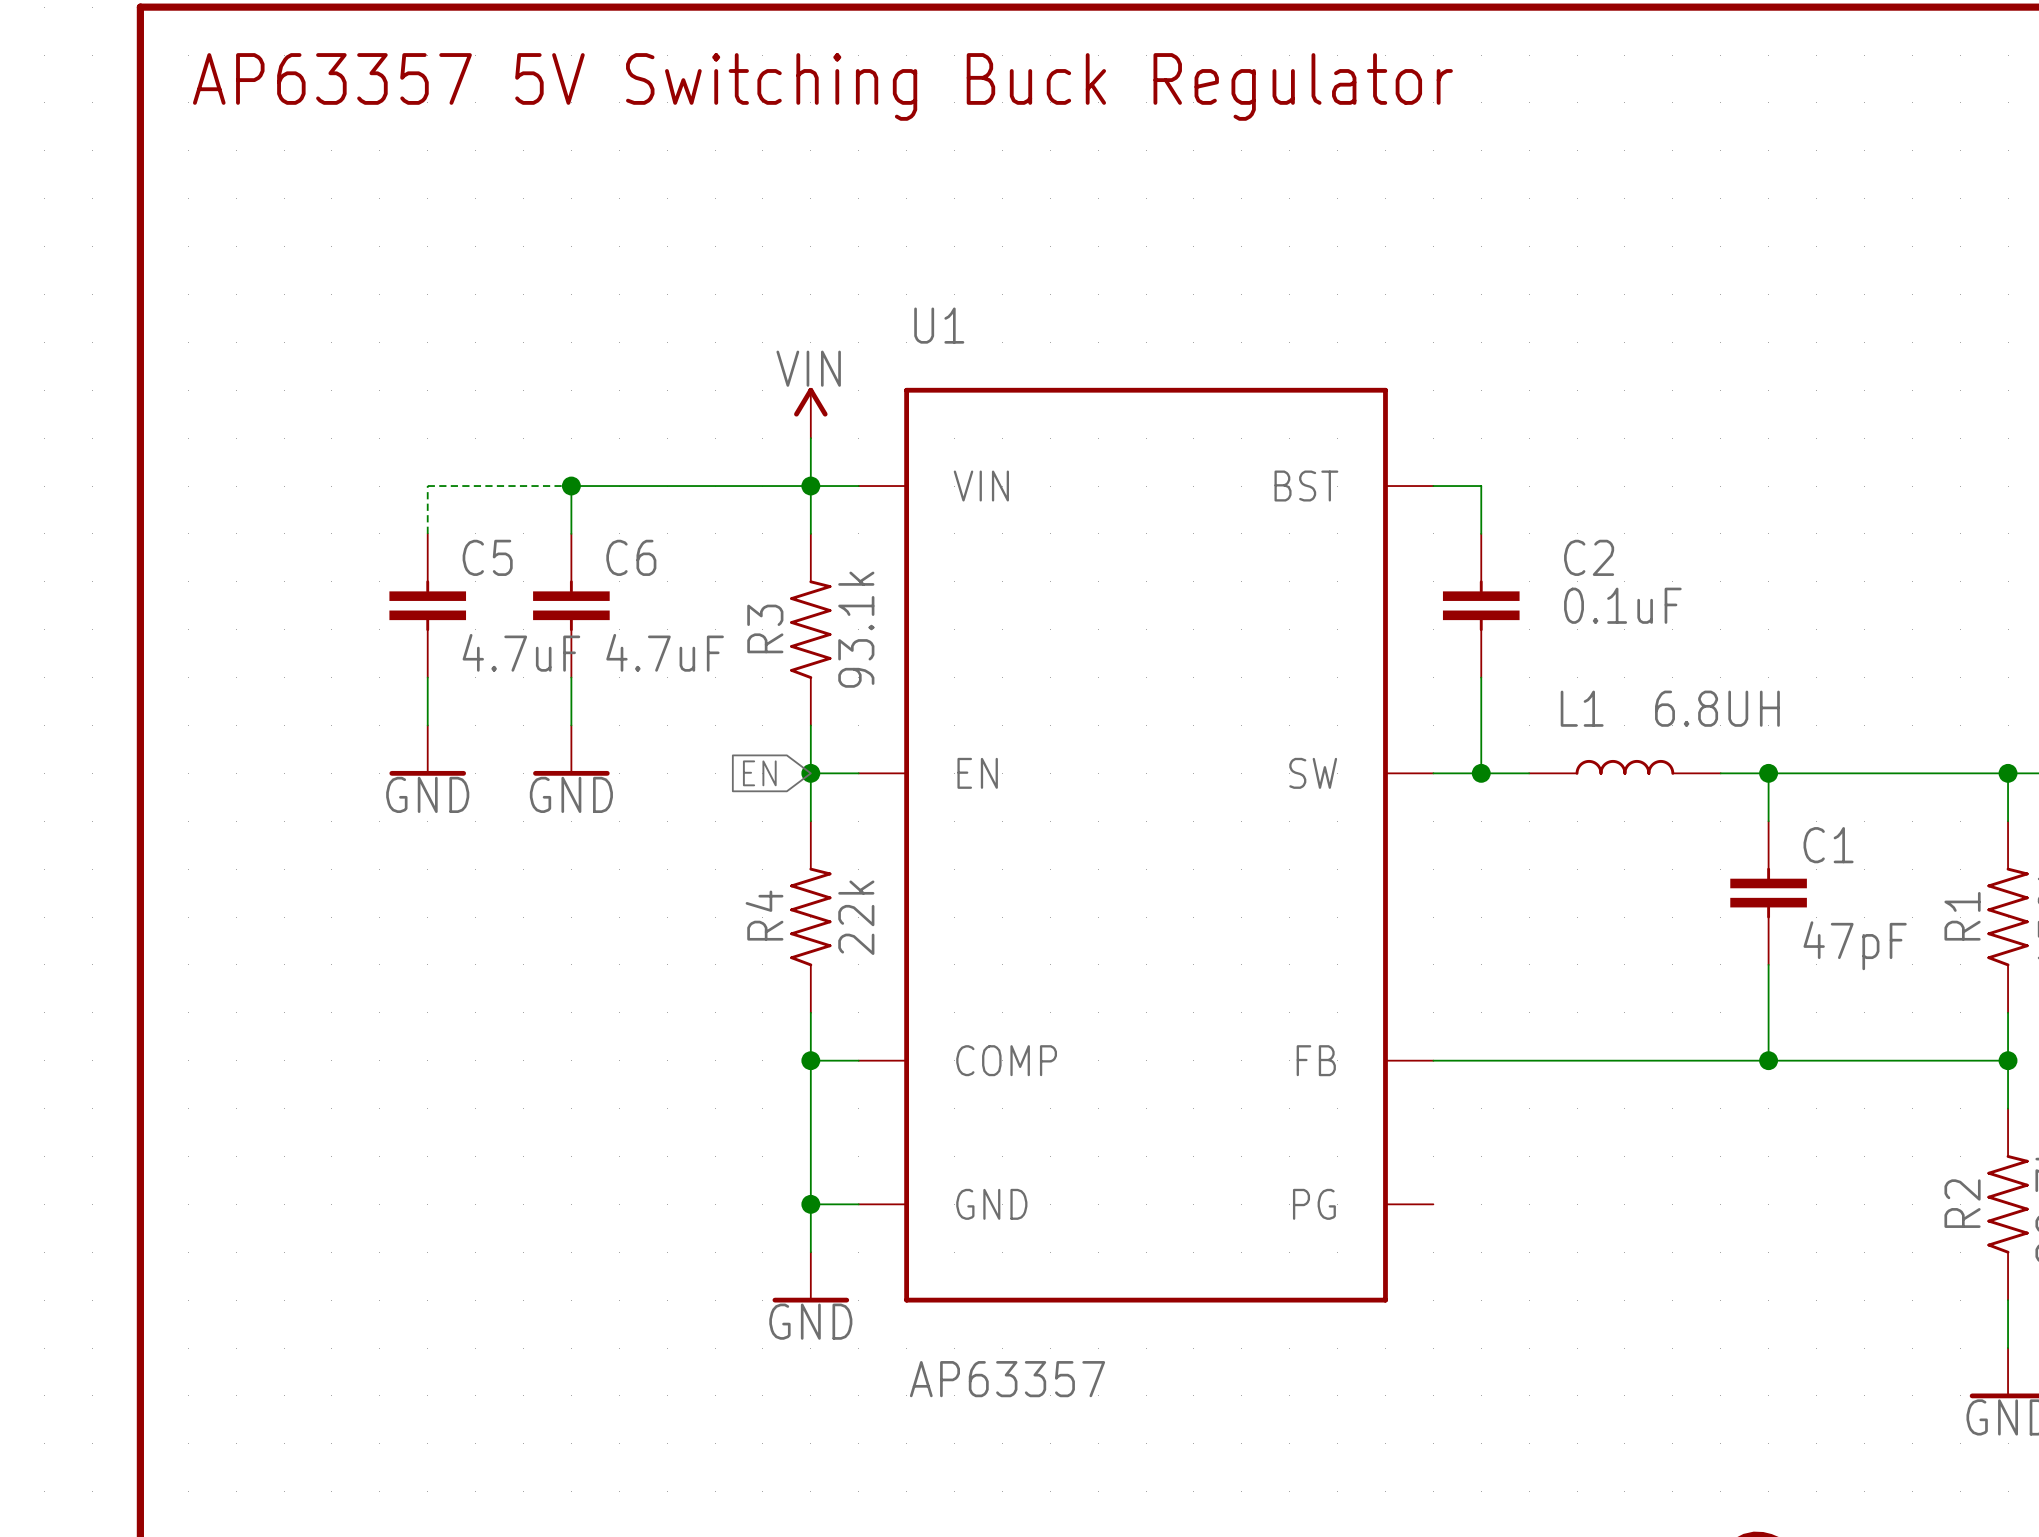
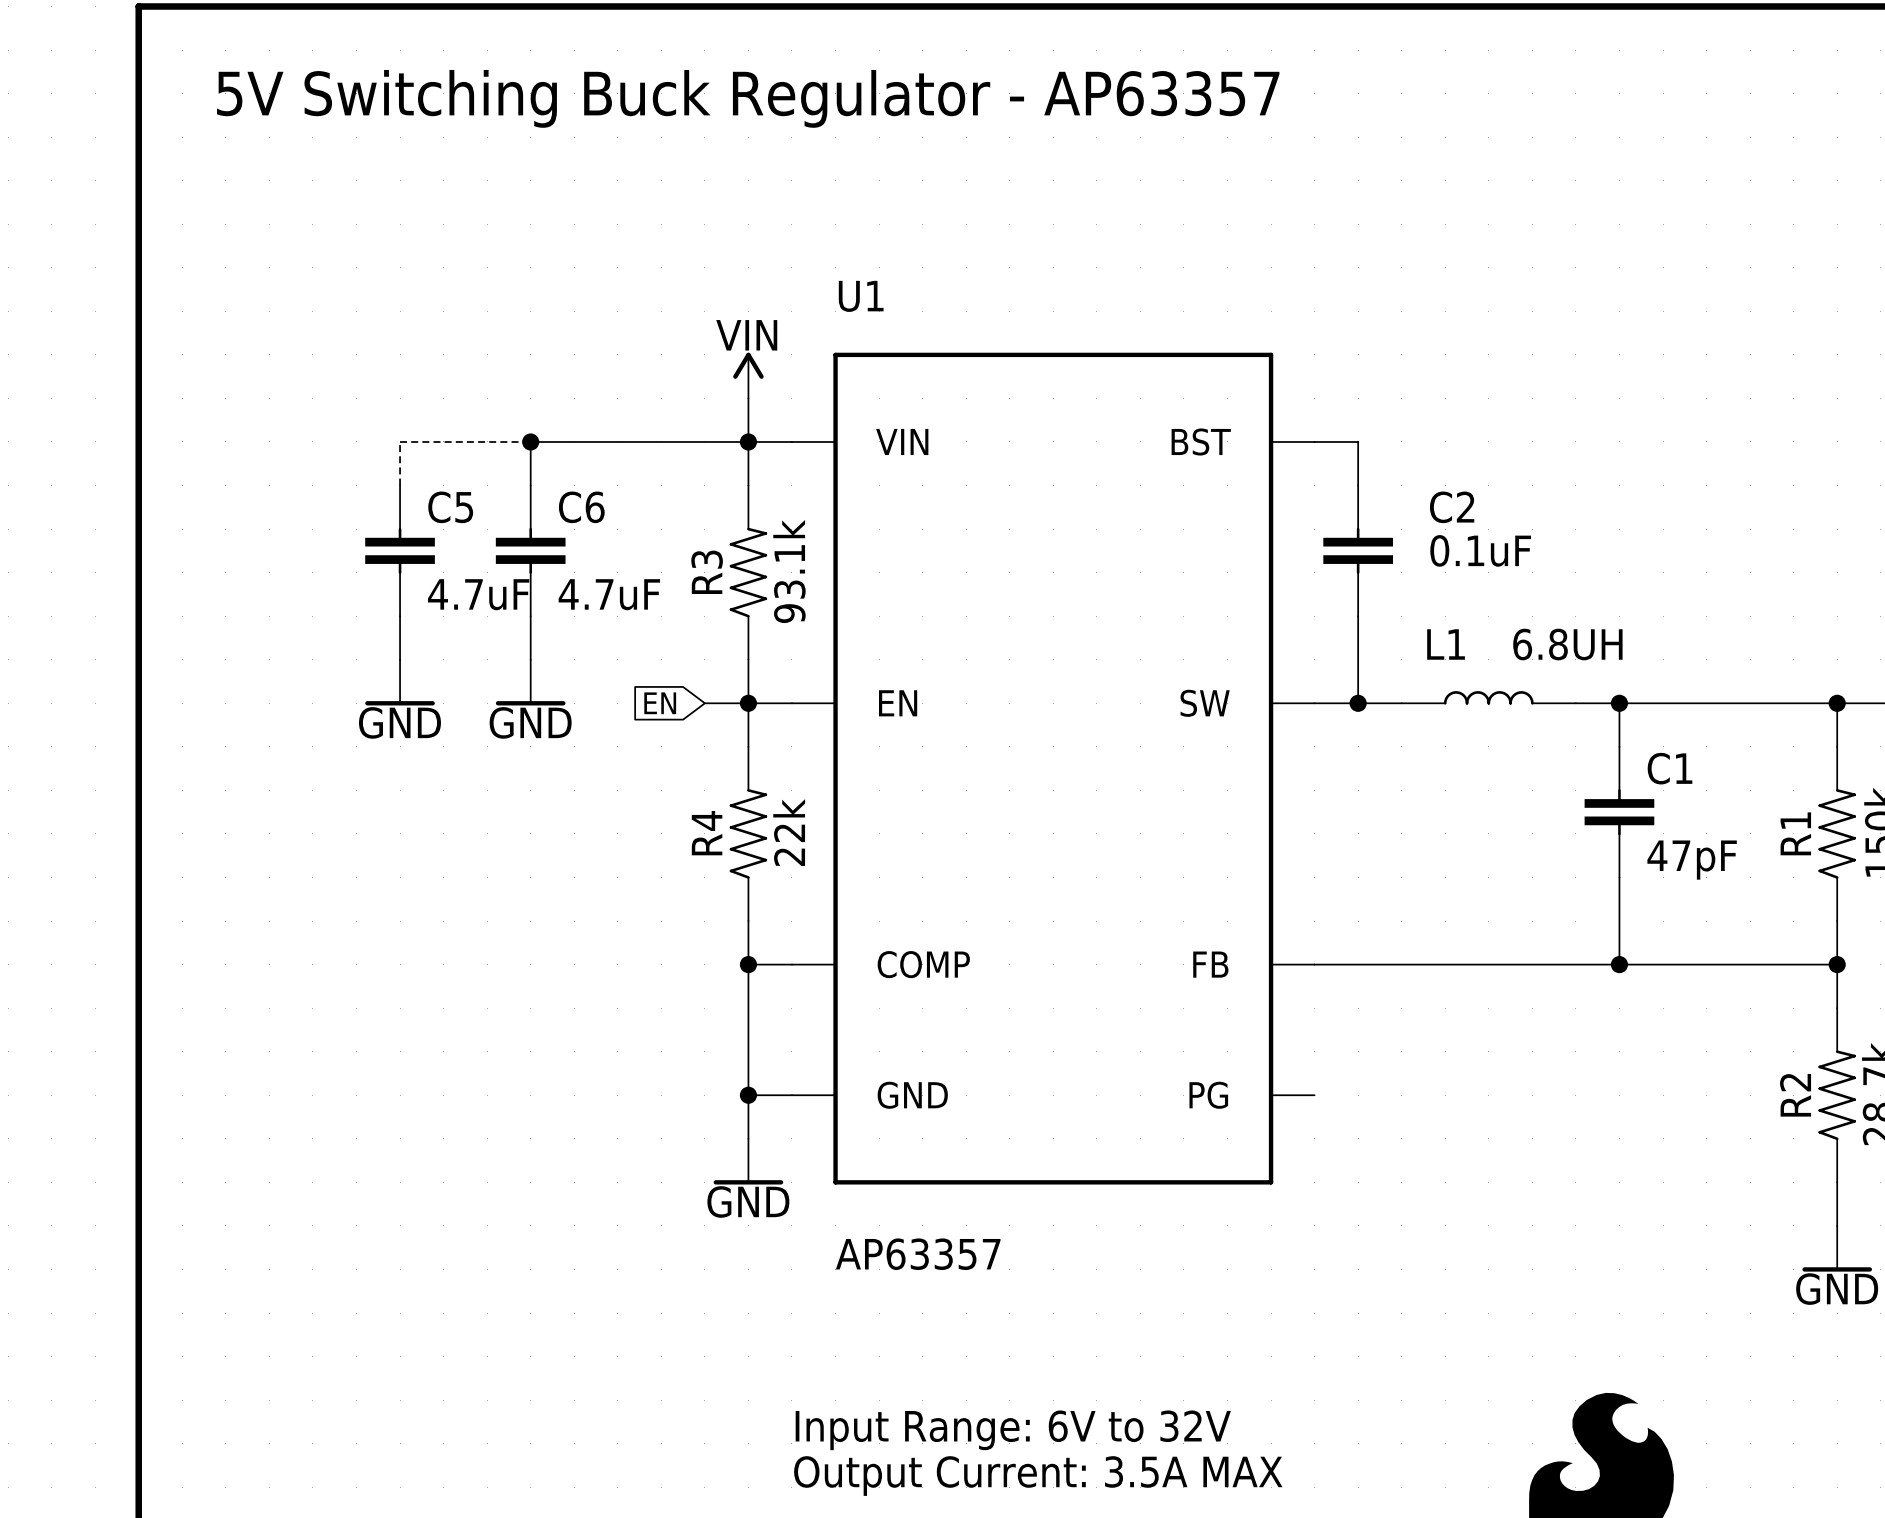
text: AP63357 5V Switching Buck Regulator (822, 86) -> none
text: none -> 5V Switching Buck Regulator - AP63357 (748, 98)
global label position: EN (759, 773) -> EN (660, 703)
wire: none -> (704, 703) (748, 703)

